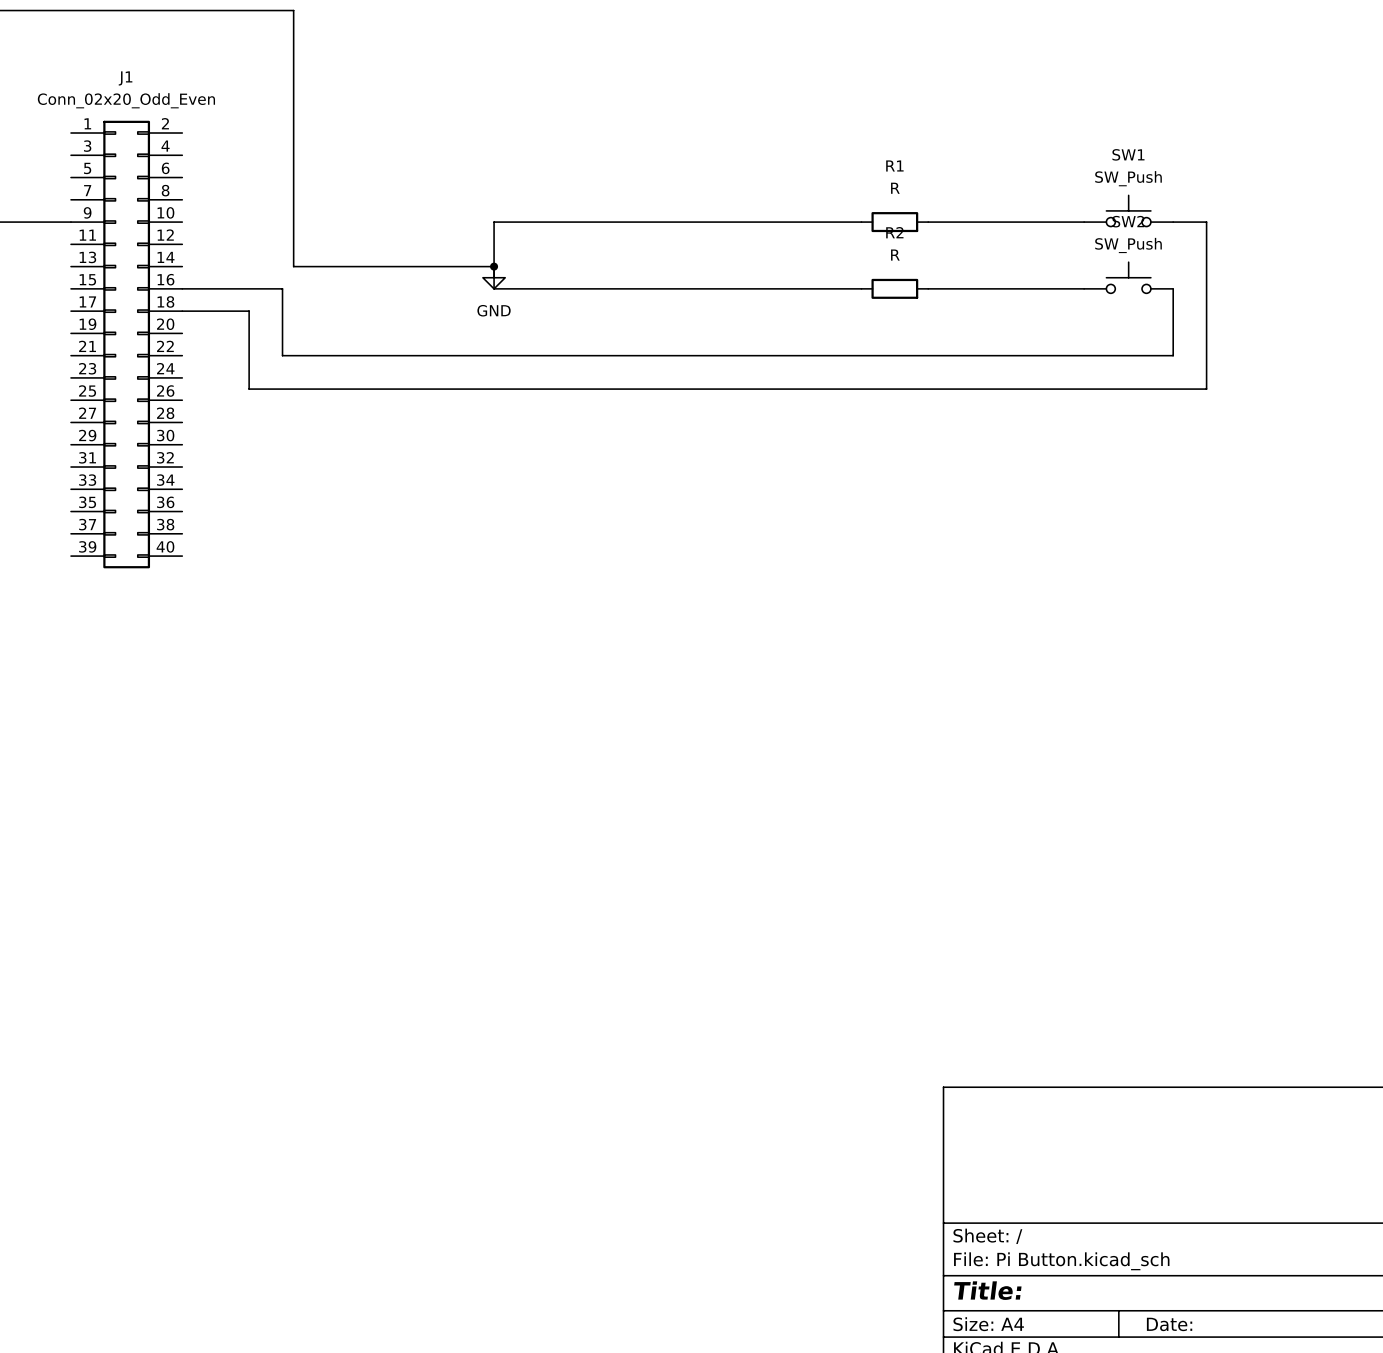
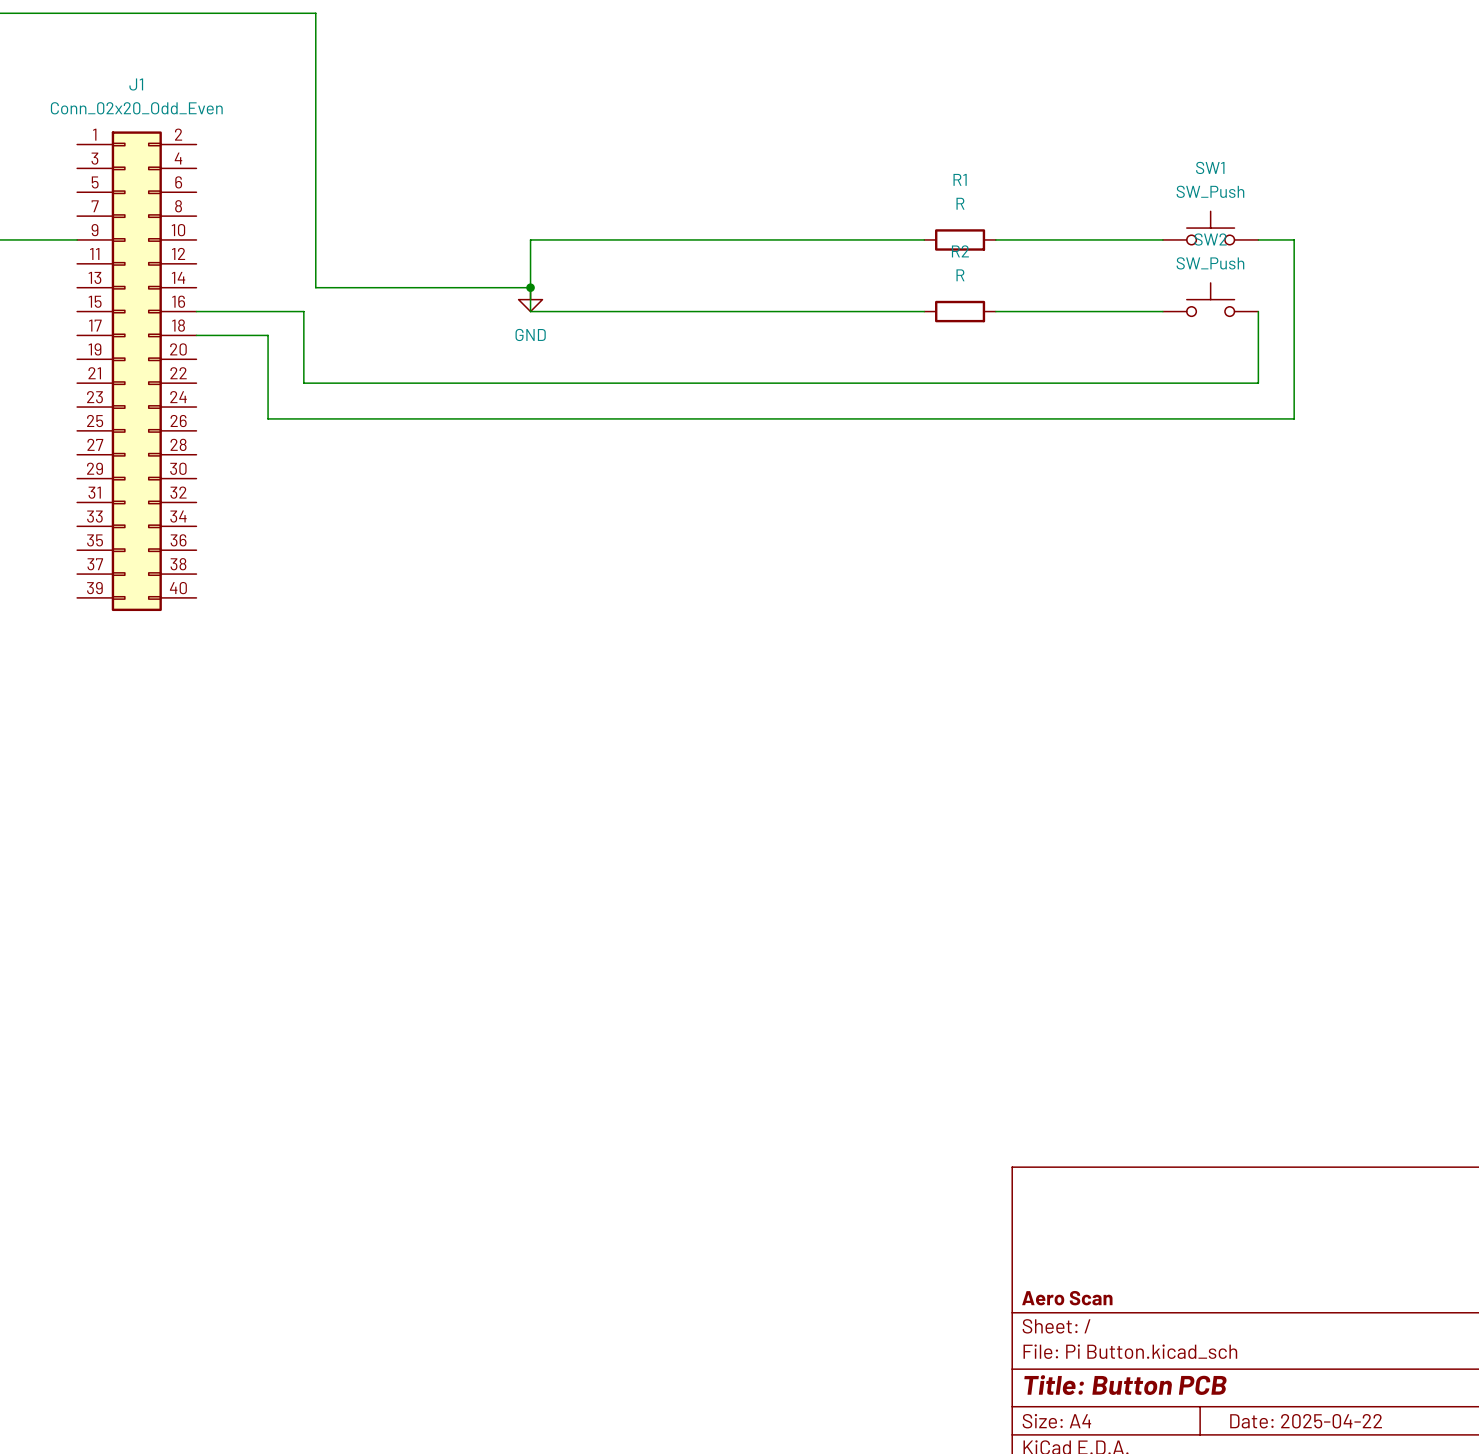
title block: none -> Aero Scan (1067, 1298)
title block: Title: (987, 1290) -> Title: Button PCB (1125, 1385)
title block: Date: (1169, 1324) -> Date: 2025-04-22 (1306, 1421)

